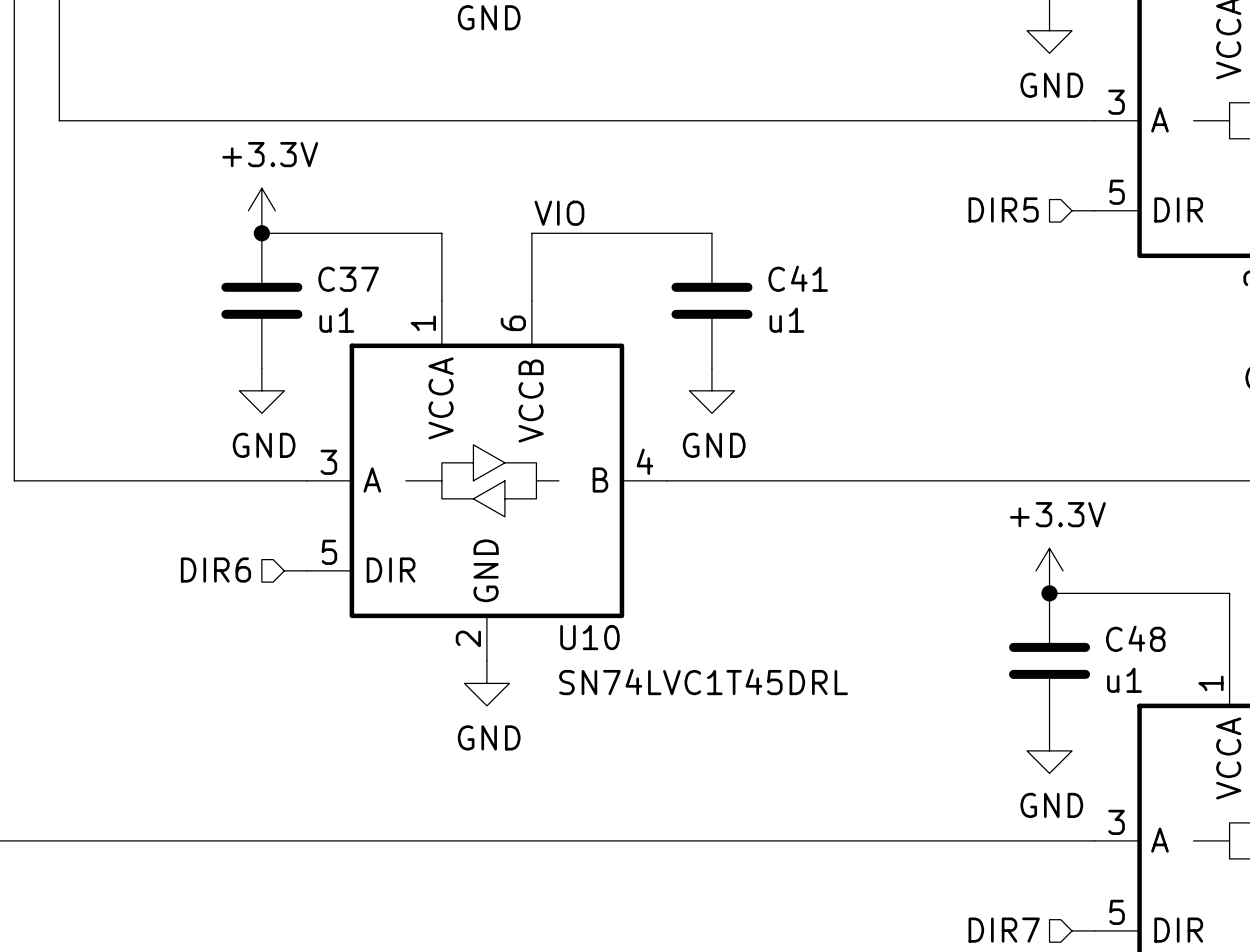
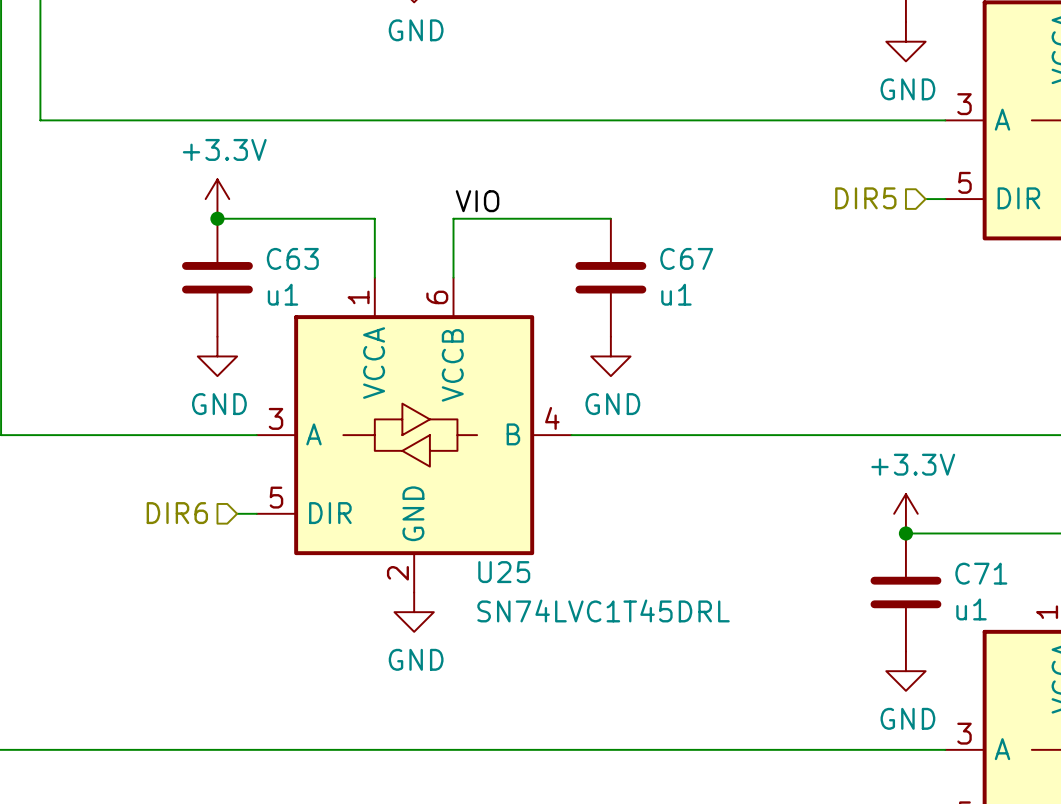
C41 name: C41 (798, 278) -> C67 (686, 258)
C37 name: C37 (348, 279) -> C63 (292, 258)
U10 name: U10 (589, 637) -> U25 (504, 572)
C48 name: C48 (1135, 638) -> C71 (981, 573)

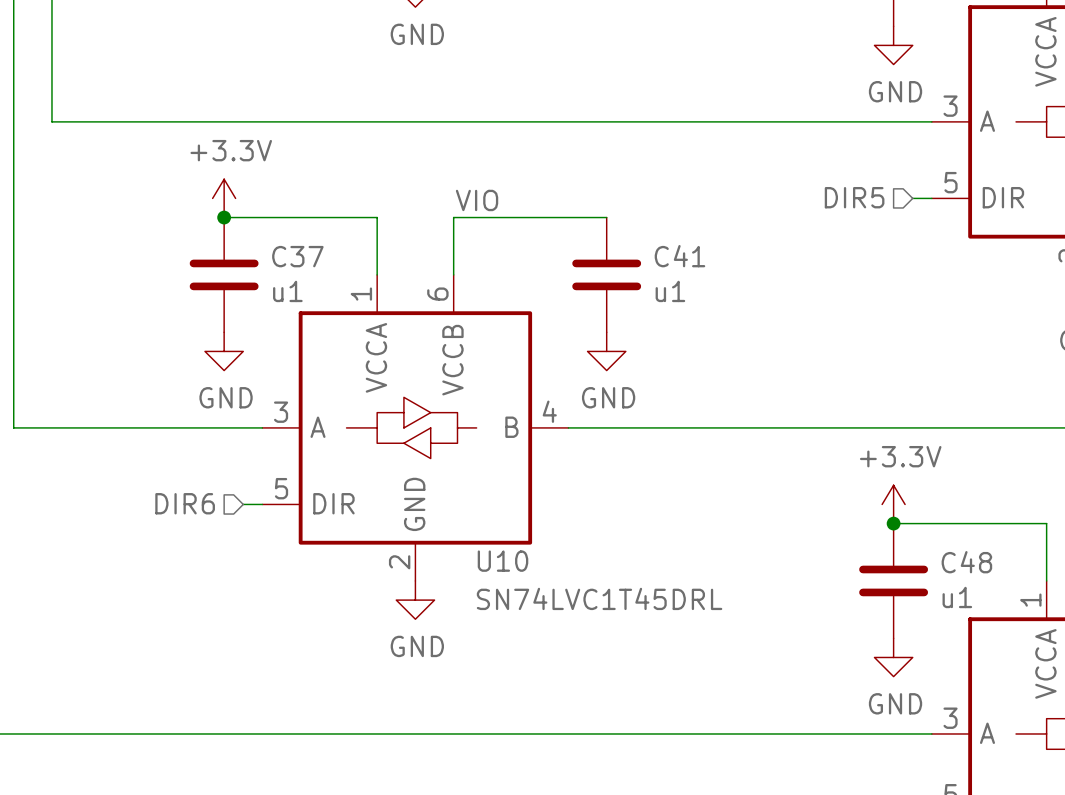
C63 name: C63 (292, 258) -> C37 (297, 256)
C67 name: C67 (686, 258) -> C41 (679, 256)
U25 name: U25 (504, 572) -> U10 (503, 561)
C71 name: C71 (981, 573) -> C48 (966, 562)

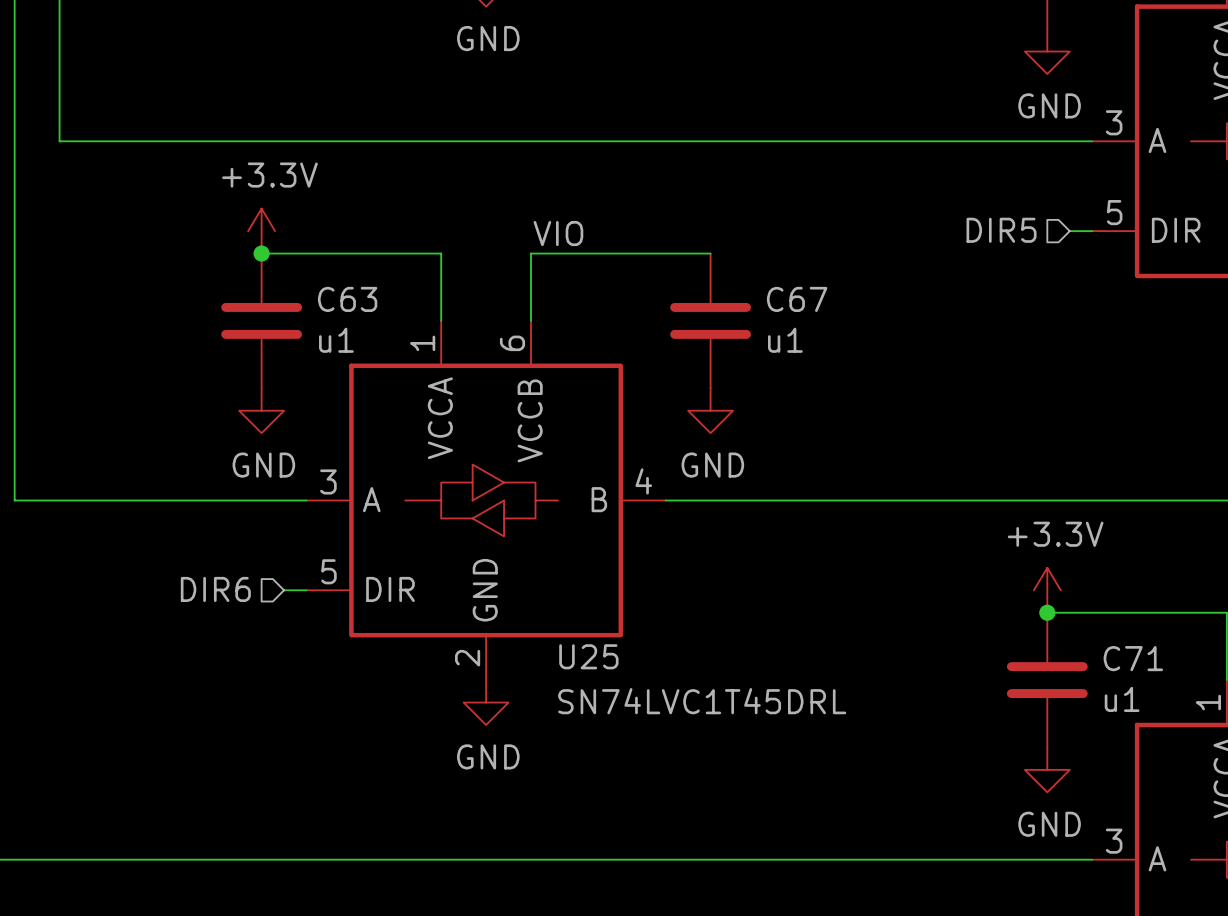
C37 name: C37 (297, 256) -> C63 (347, 299)
C41 name: C41 (679, 256) -> C67 (797, 299)
U10 name: U10 (503, 561) -> U25 (588, 656)
C48 name: C48 (966, 562) -> C71 (1133, 658)

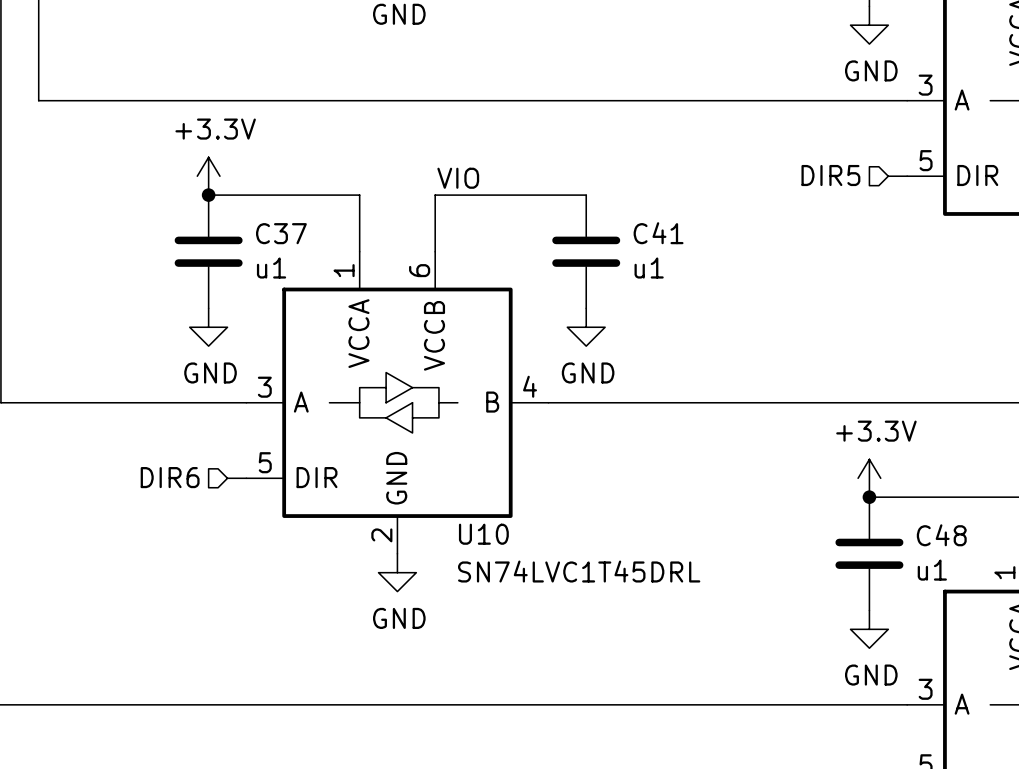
C63 name: C63 (347, 299) -> C37 (281, 233)
C67 name: C67 (797, 299) -> C41 (658, 233)
U25 name: U25 (588, 656) -> U10 (483, 534)
C71 name: C71 (1133, 658) -> C48 (941, 535)

